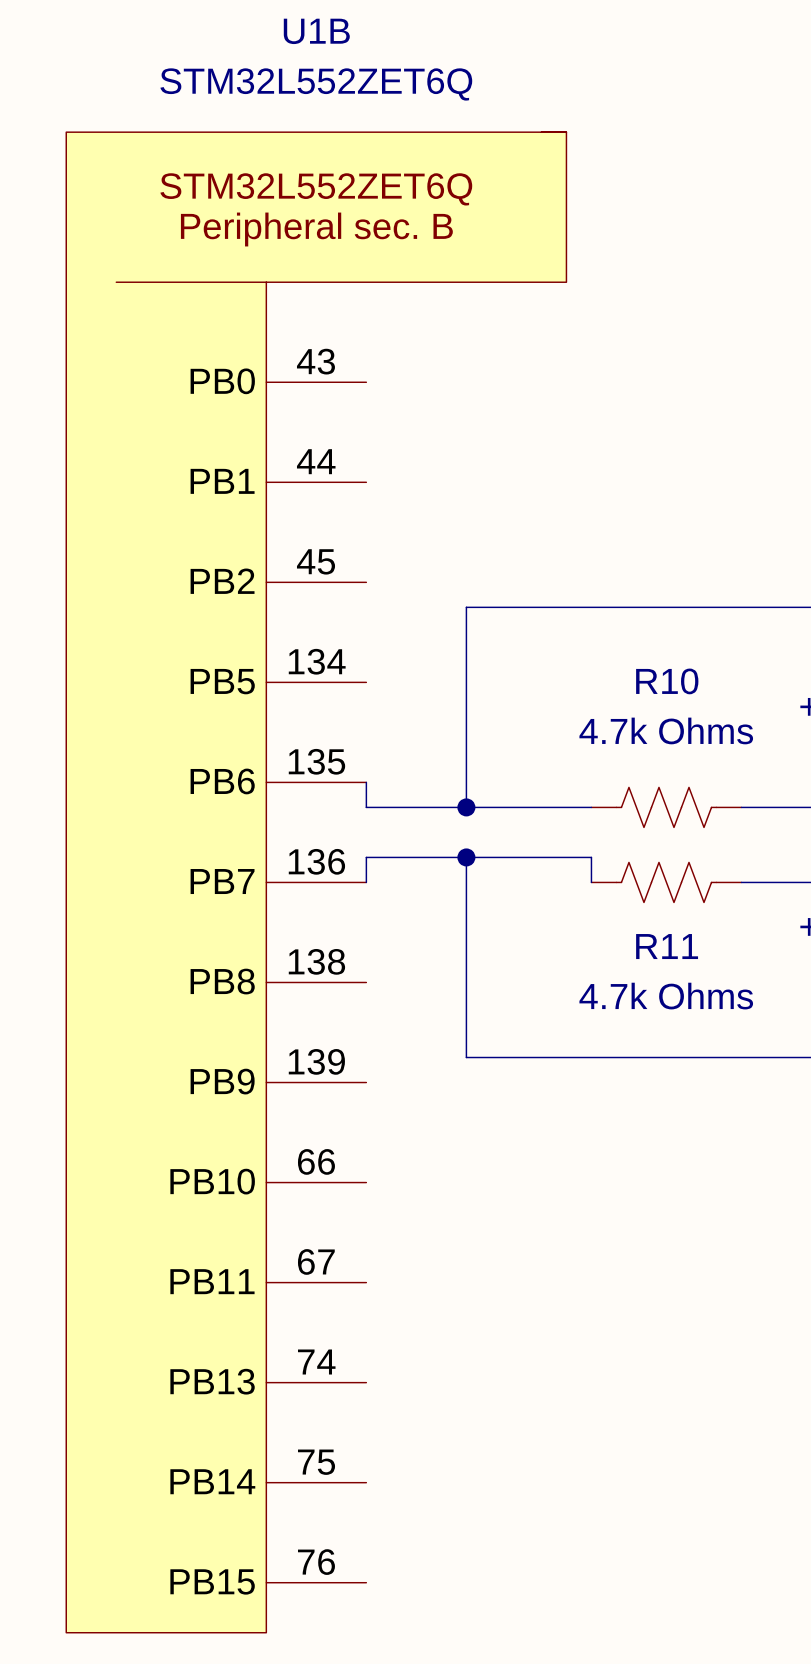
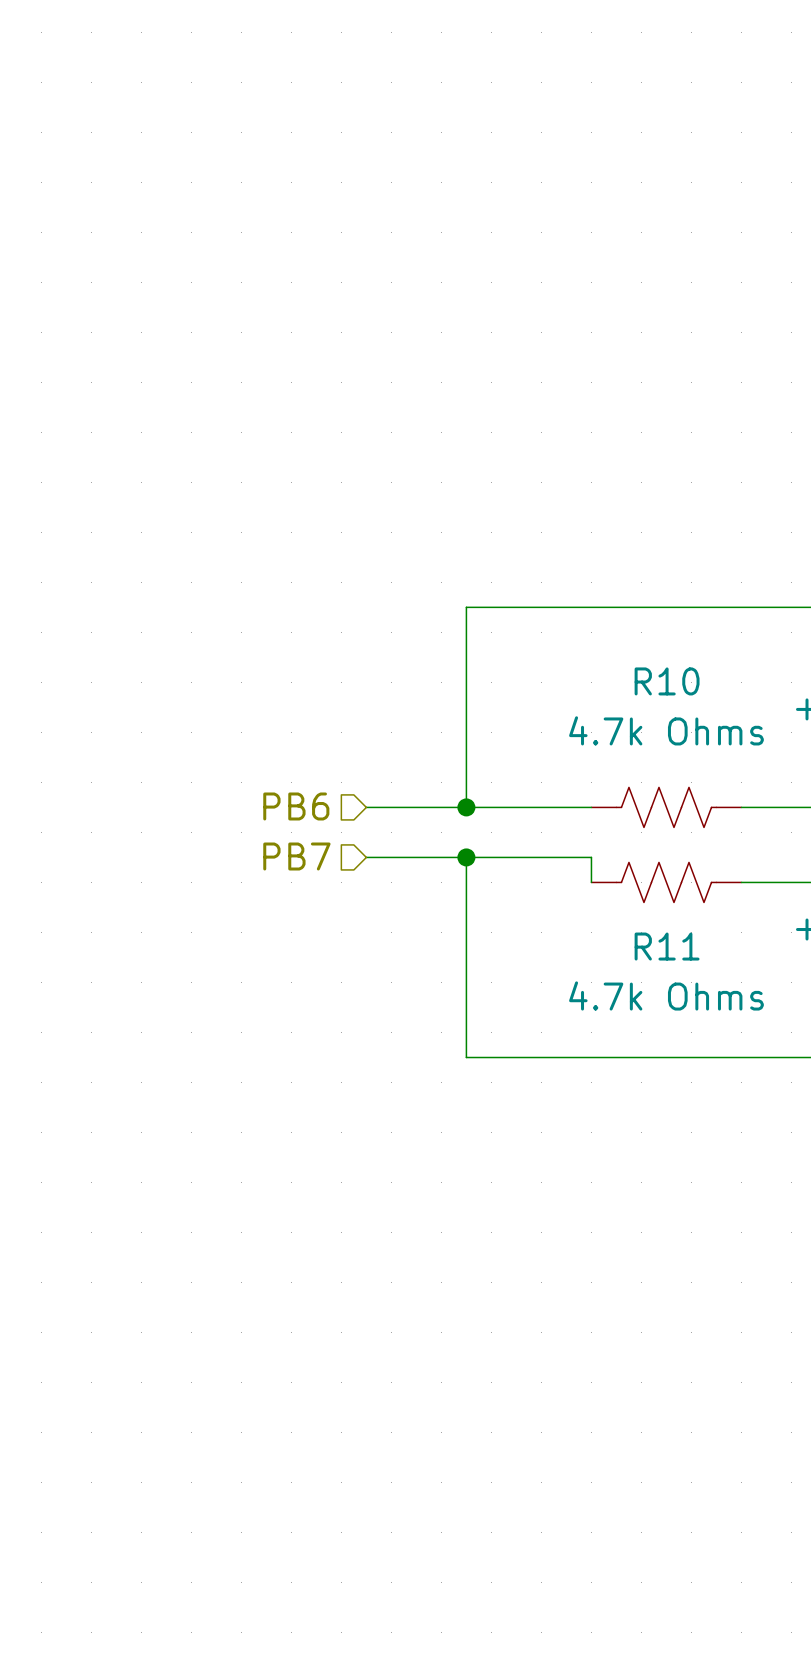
wire: (366, 782) (366, 807) -> none
hierarchical label: none -> PB6 (296, 806)
hierarchical label: none -> PB7 (296, 856)
wire: (366, 857) (366, 882) -> none
U1B: STM32L552ZET6Q (316, 882) -> none

